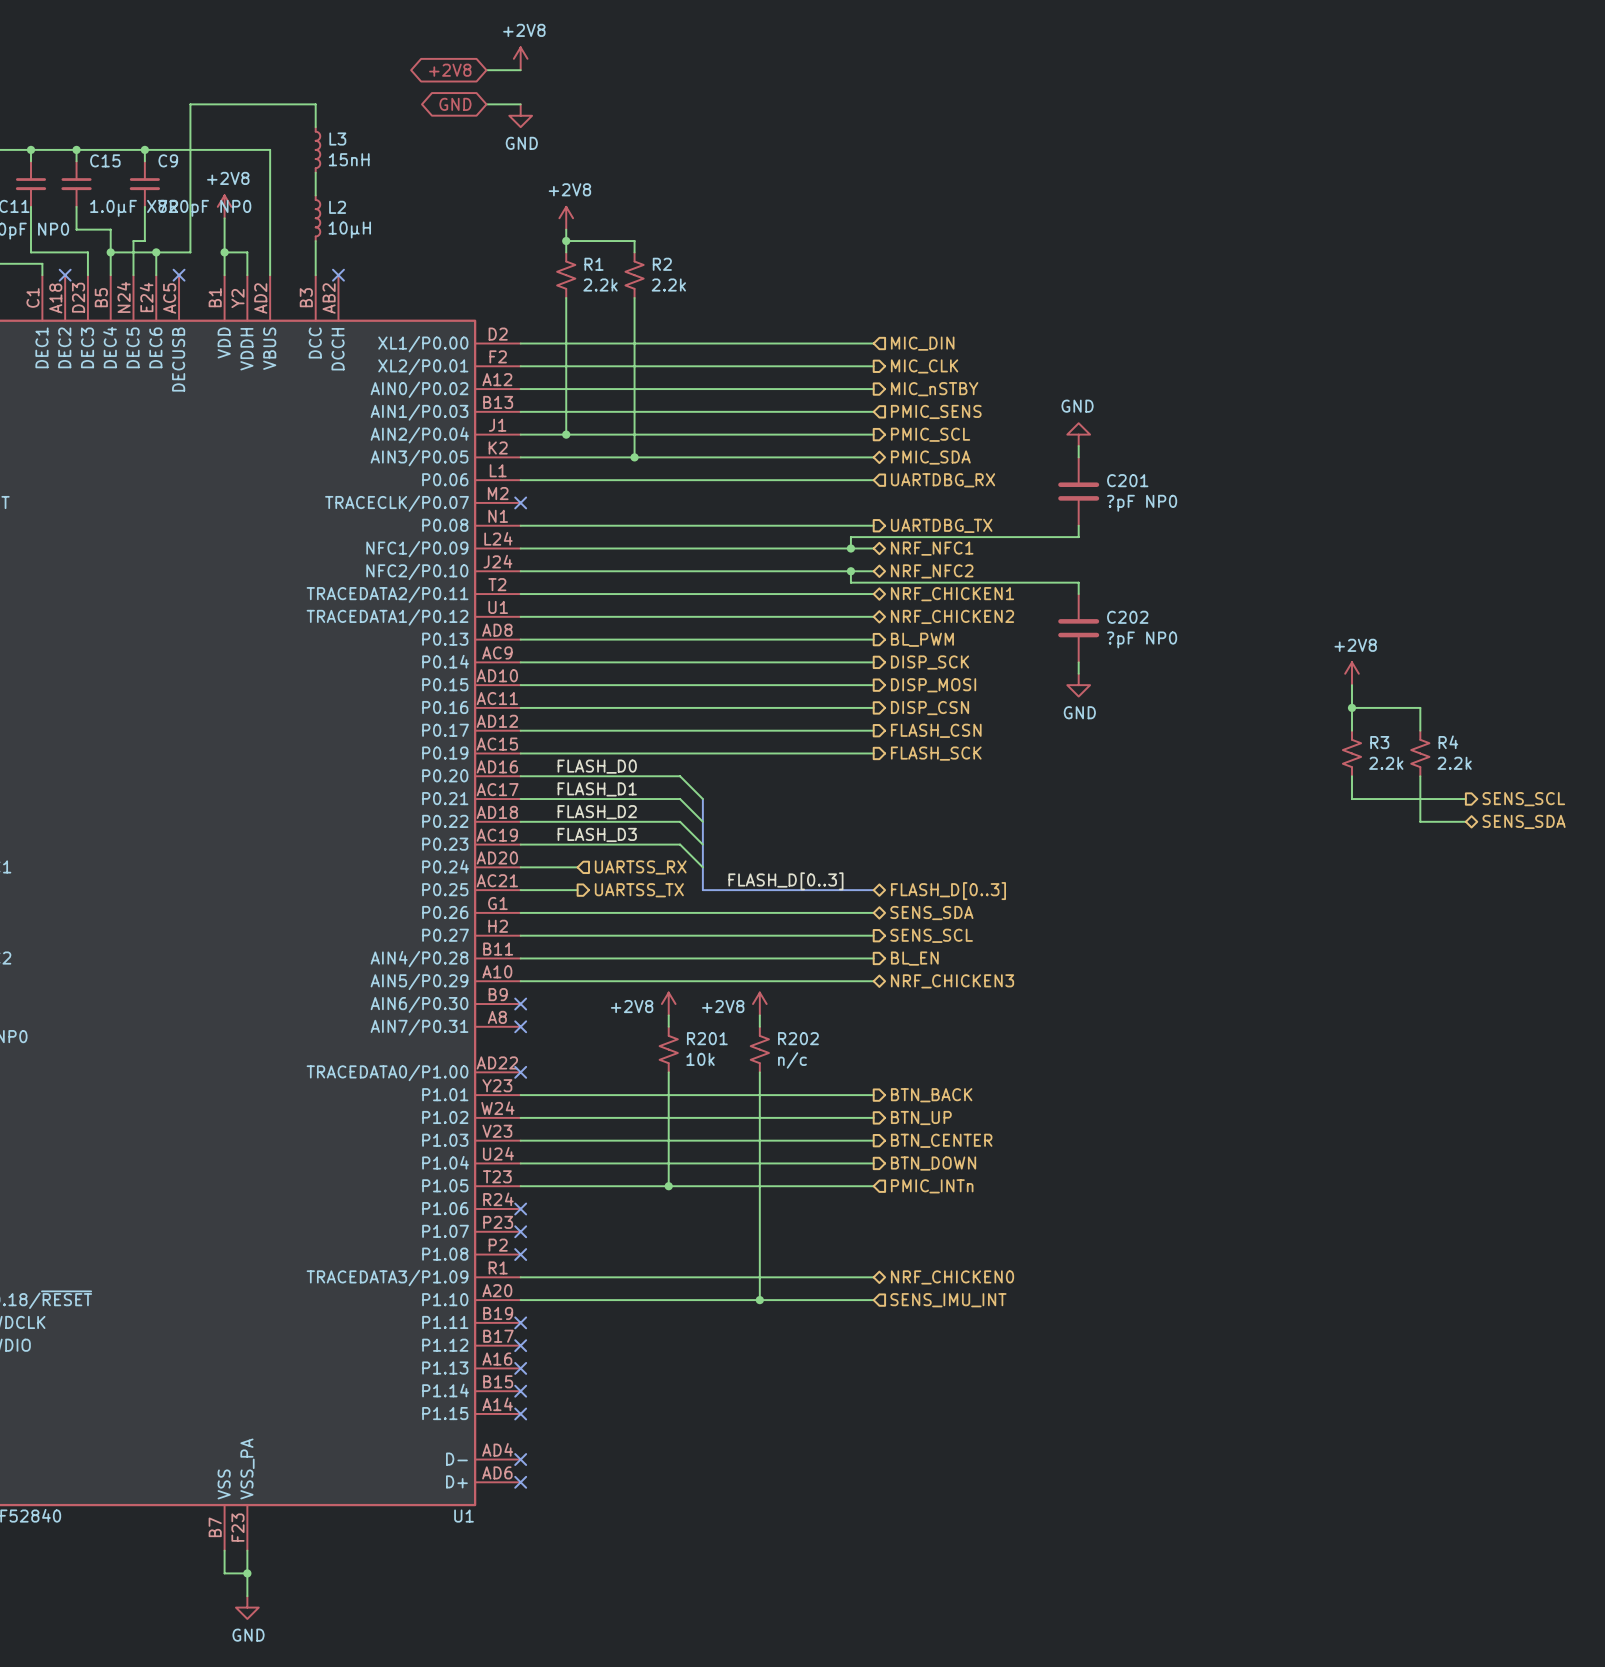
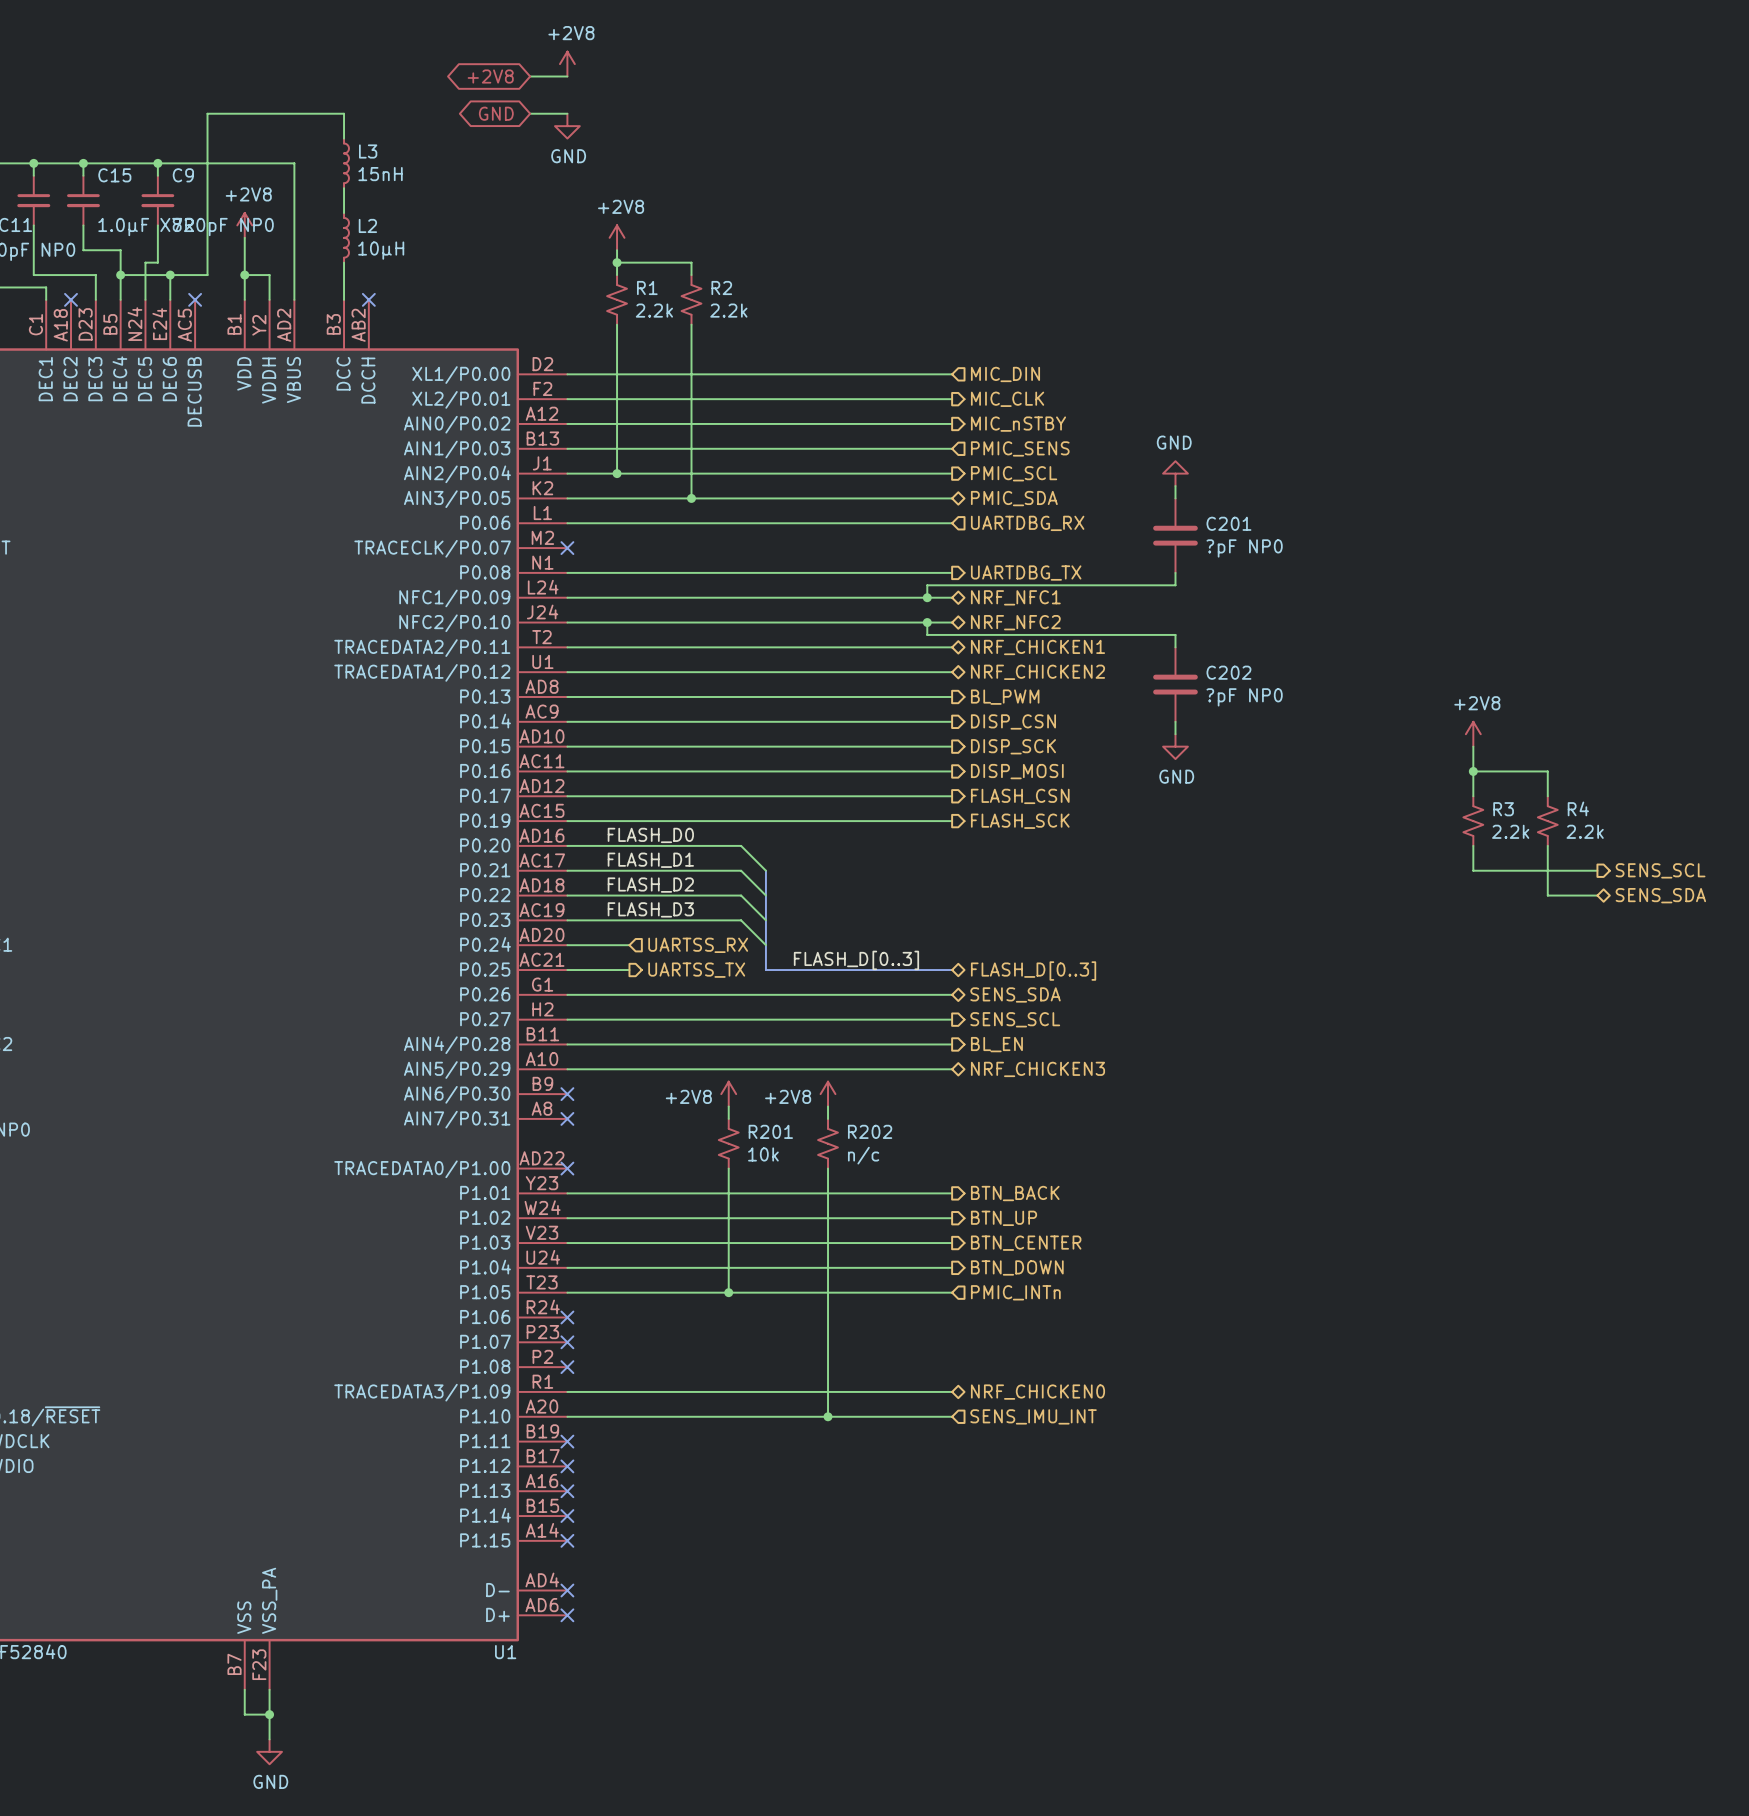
hierarchical label: DISP_SCK (930, 662) -> DISP_CSN (1013, 721)
hierarchical label: DISP_MOSI (933, 685) -> DISP_SCK (1013, 746)
hierarchical label: DISP_CSN (930, 708) -> DISP_MOSI (1017, 771)

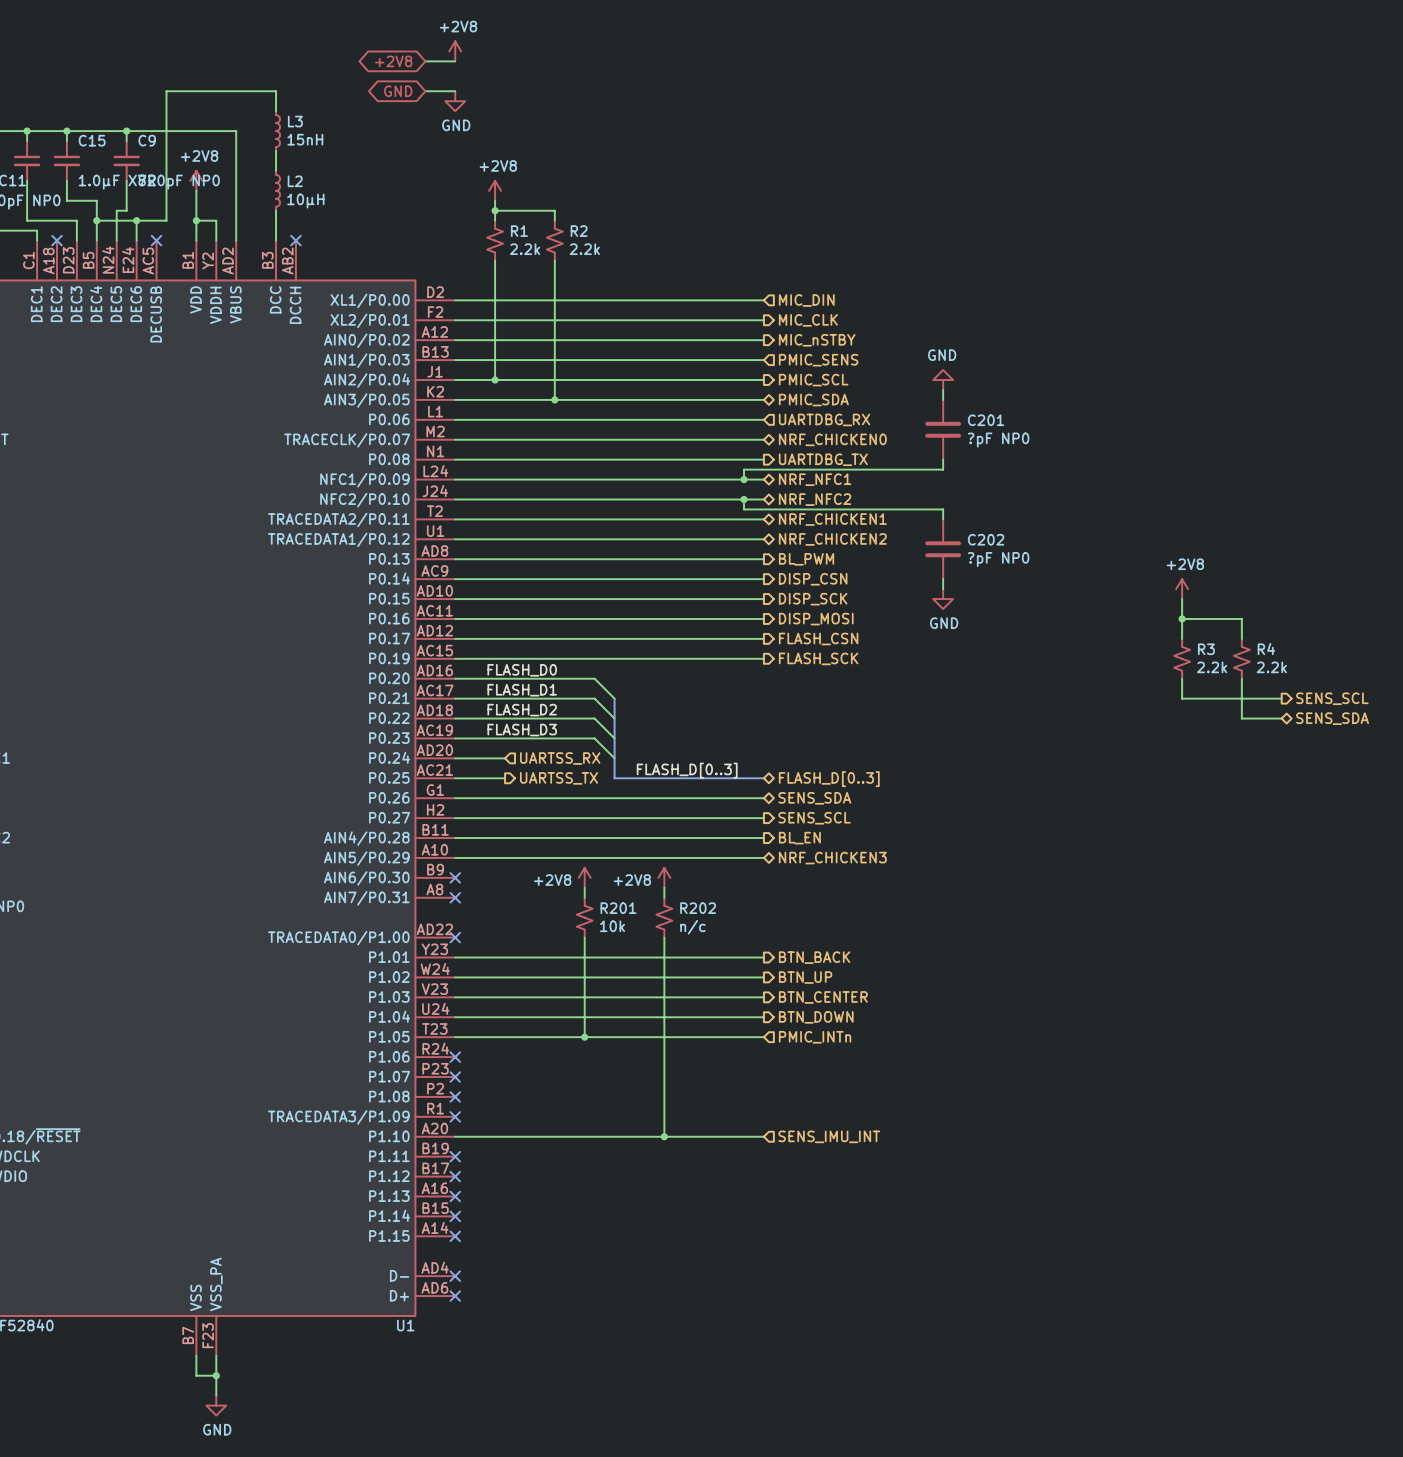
wire: none -> (455, 439) (763, 439)
no-connect mark: (567, 548) -> none
hierarchical label: none -> NRF_CHICKEN0 (832, 439)
wire: (567, 1391) (952, 1391) -> none
no-connect mark: none -> (455, 1116)
hierarchical label: NRF_CHICKEN0 (1037, 1392) -> none

